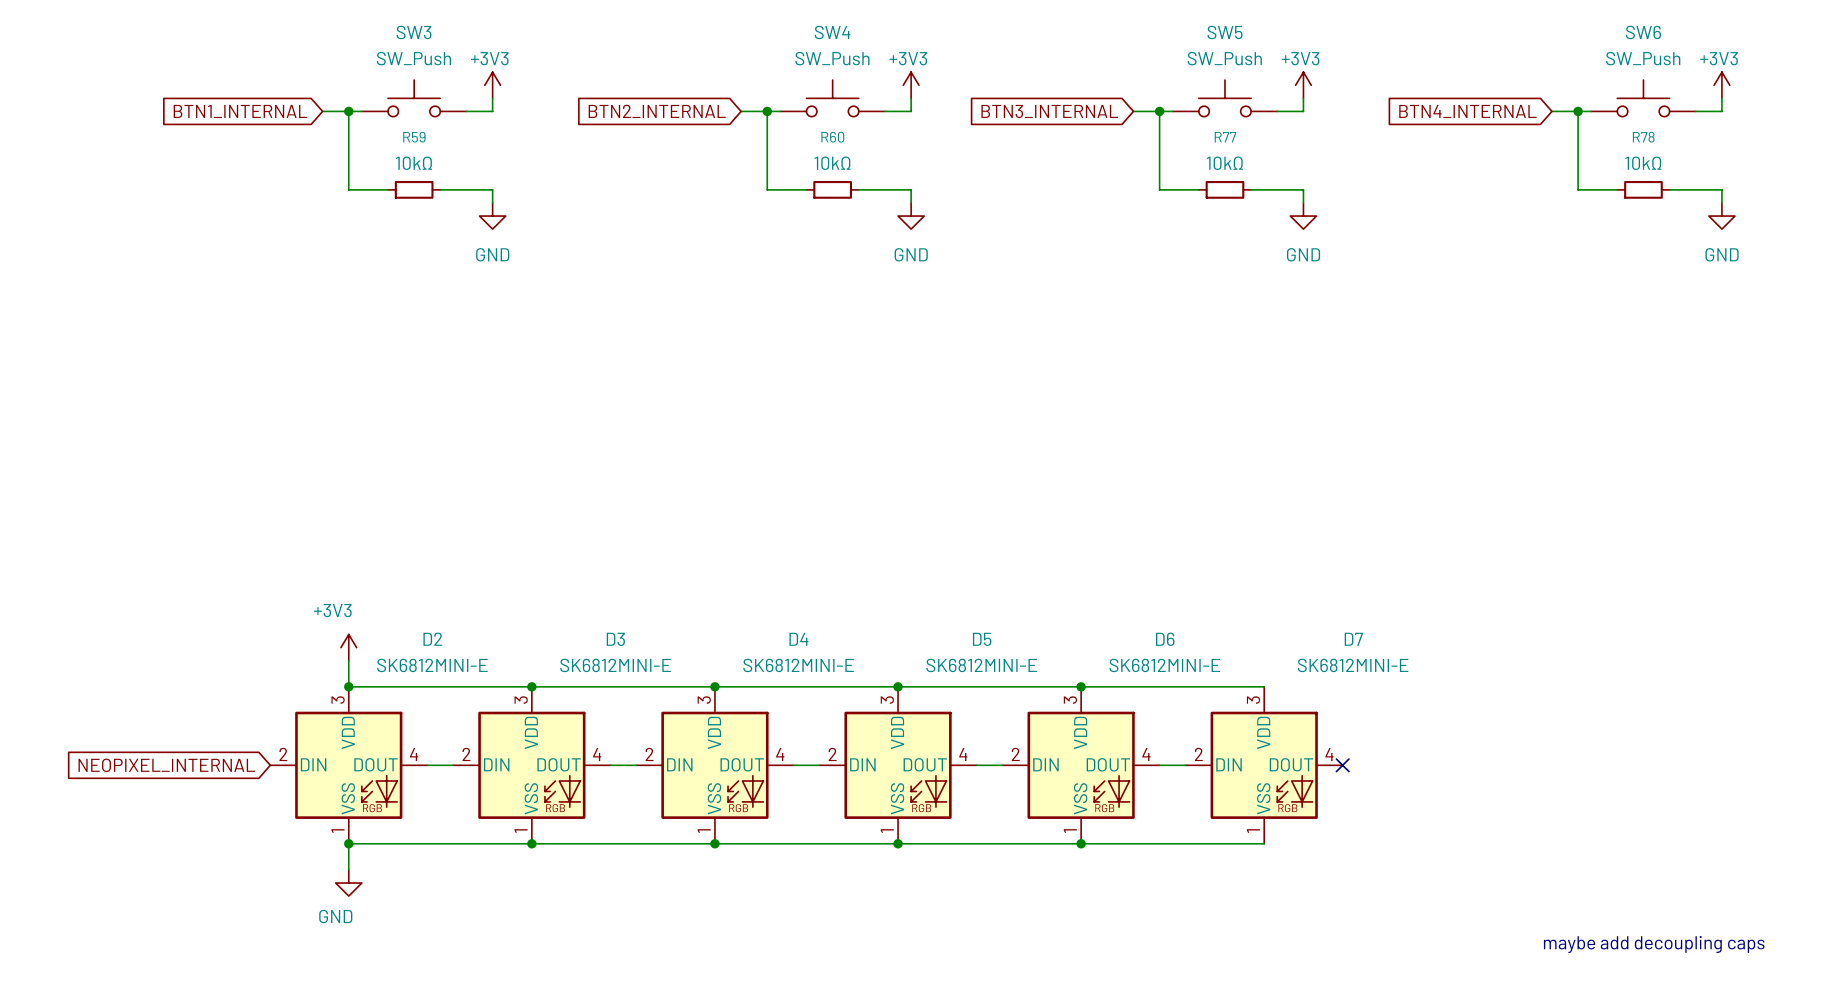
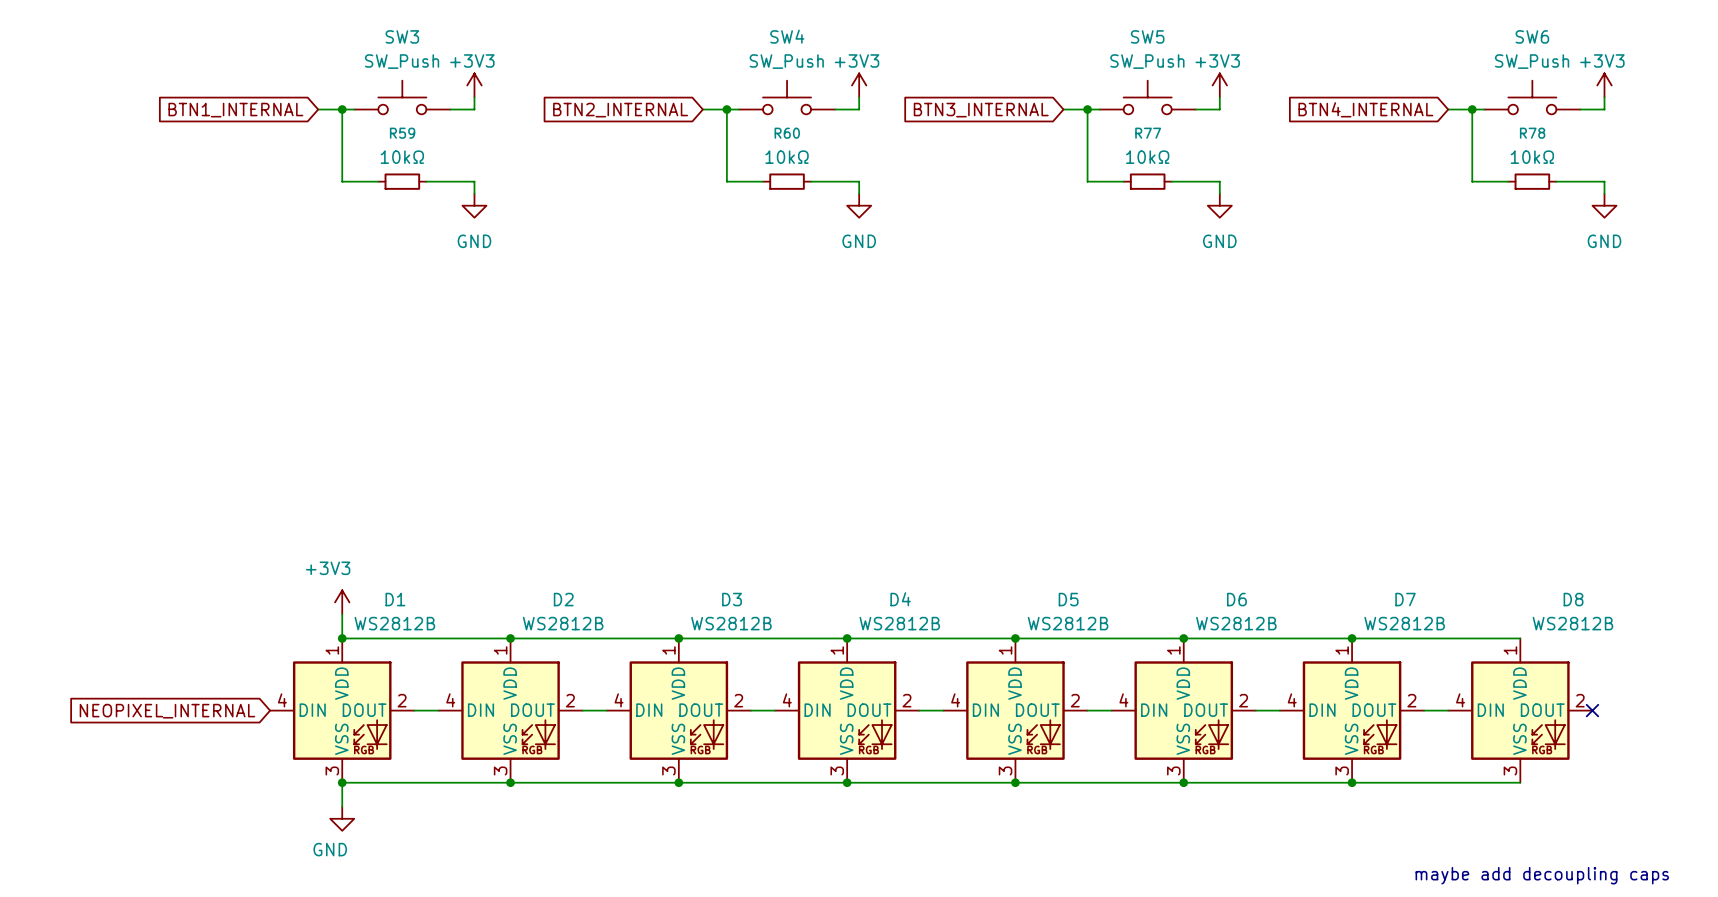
D2 name position: D2 (432, 639) -> D2 (563, 599)
D3 name position: D3 (615, 639) -> D3 (732, 599)
D4 name position: D4 (798, 639) -> D4 (900, 599)
D5 name position: D5 (982, 639) -> D5 (1068, 599)
D6 name position: D6 (1165, 639) -> D6 (1236, 599)
D7 name position: D7 (1353, 639) -> D7 (1405, 599)
D2 value: SK6812MINI-E (432, 665) -> WS2812B (563, 623)
D3 value: SK6812MINI-E (615, 665) -> WS2812B (731, 623)
D4 value: SK6812MINI-E (798, 665) -> WS2812B (899, 623)
D5 value: SK6812MINI-E (981, 665) -> WS2812B (1068, 623)
D6 value: SK6812MINI-E (1164, 665) -> WS2812B (1236, 623)
D7 value: SK6812MINI-E (1353, 665) -> WS2812B (1404, 623)
wire: none -> (1183, 638) (1520, 638)
junction: none -> (1183, 638)
junction: none -> (1352, 638)
D2 pin number: 3 (338, 700) -> 1 (500, 650)
D3 pin number: 3 (521, 700) -> 1 (668, 650)
D4 pin number: 3 (704, 700) -> 1 (837, 650)
D5 pin number: 3 (887, 700) -> 1 (1005, 650)
D6 pin number: 3 (1070, 700) -> 1 (1173, 650)
D7 pin number: 3 (1253, 700) -> 1 (1342, 650)
D2 pin number: 2 (283, 754) -> 4 (450, 700)
D2 pin number: 4 (414, 754) -> 2 (570, 700)
D3 pin number: 2 (466, 754) -> 4 (619, 700)
D3 pin number: 4 (597, 754) -> 2 (738, 700)
D4 pin number: 2 (649, 754) -> 4 (787, 700)
D4 pin number: 4 (780, 754) -> 2 (906, 700)
D5 pin number: 2 (832, 754) -> 4 (955, 700)
D5 pin number: 4 (963, 754) -> 2 (1075, 700)
D6 pin number: 2 (1015, 754) -> 4 (1123, 700)
D6 pin number: 4 (1146, 754) -> 2 (1243, 700)
D7 pin number: 2 (1198, 754) -> 4 (1292, 700)
D7 pin number: 4 (1329, 754) -> 2 (1411, 700)
D2 position: (348, 765) -> (510, 710)
D1: none -> WS2812B (342, 710)
D3 position: (531, 765) -> (678, 710)
D4 position: (714, 765) -> (847, 710)
D5 position: (898, 765) -> (1015, 710)
D6 position: (1081, 765) -> (1183, 710)
D7 position: (1264, 765) -> (1352, 710)
wire: none -> (1255, 710) (1279, 710)
no-connect mark: (1342, 765) -> none
wire: none -> (1424, 710) (1448, 710)
D8: none -> WS2812B (1520, 710)
no-connect mark: none -> (1592, 710)
D2 pin number: 1 (337, 831) -> 3 (500, 770)
D3 pin number: 1 (521, 831) -> 3 (668, 770)
D4 pin number: 1 (704, 831) -> 3 (837, 770)
D5 pin number: 1 (887, 831) -> 3 (1005, 770)
D6 pin number: 1 (1070, 831) -> 3 (1173, 770)
D7 pin number: 1 (1253, 831) -> 3 (1342, 770)
wire: none -> (1183, 782) (1520, 782)
junction: none -> (1183, 782)
junction: none -> (1352, 782)

